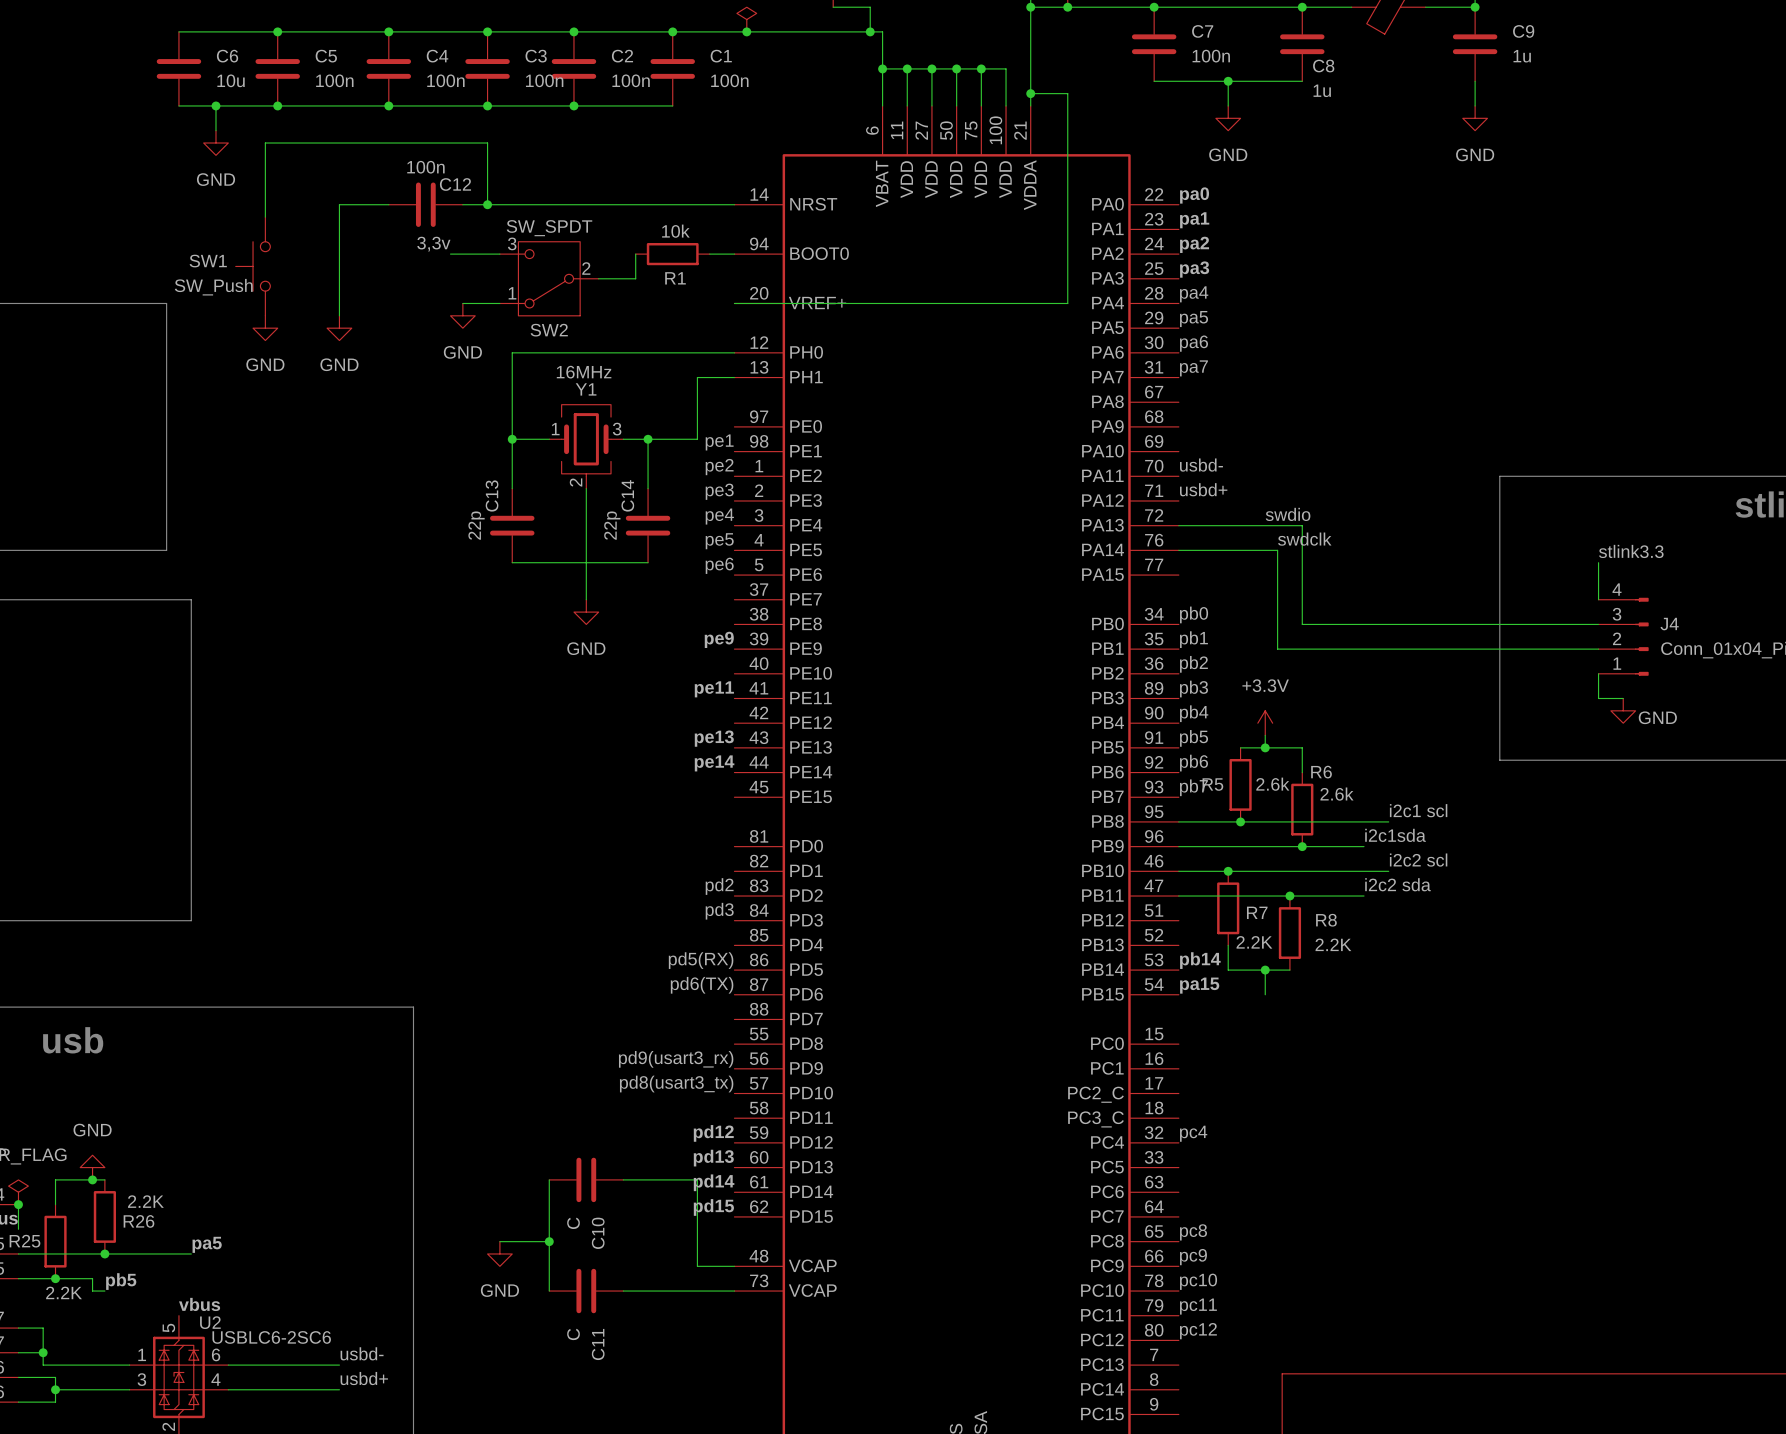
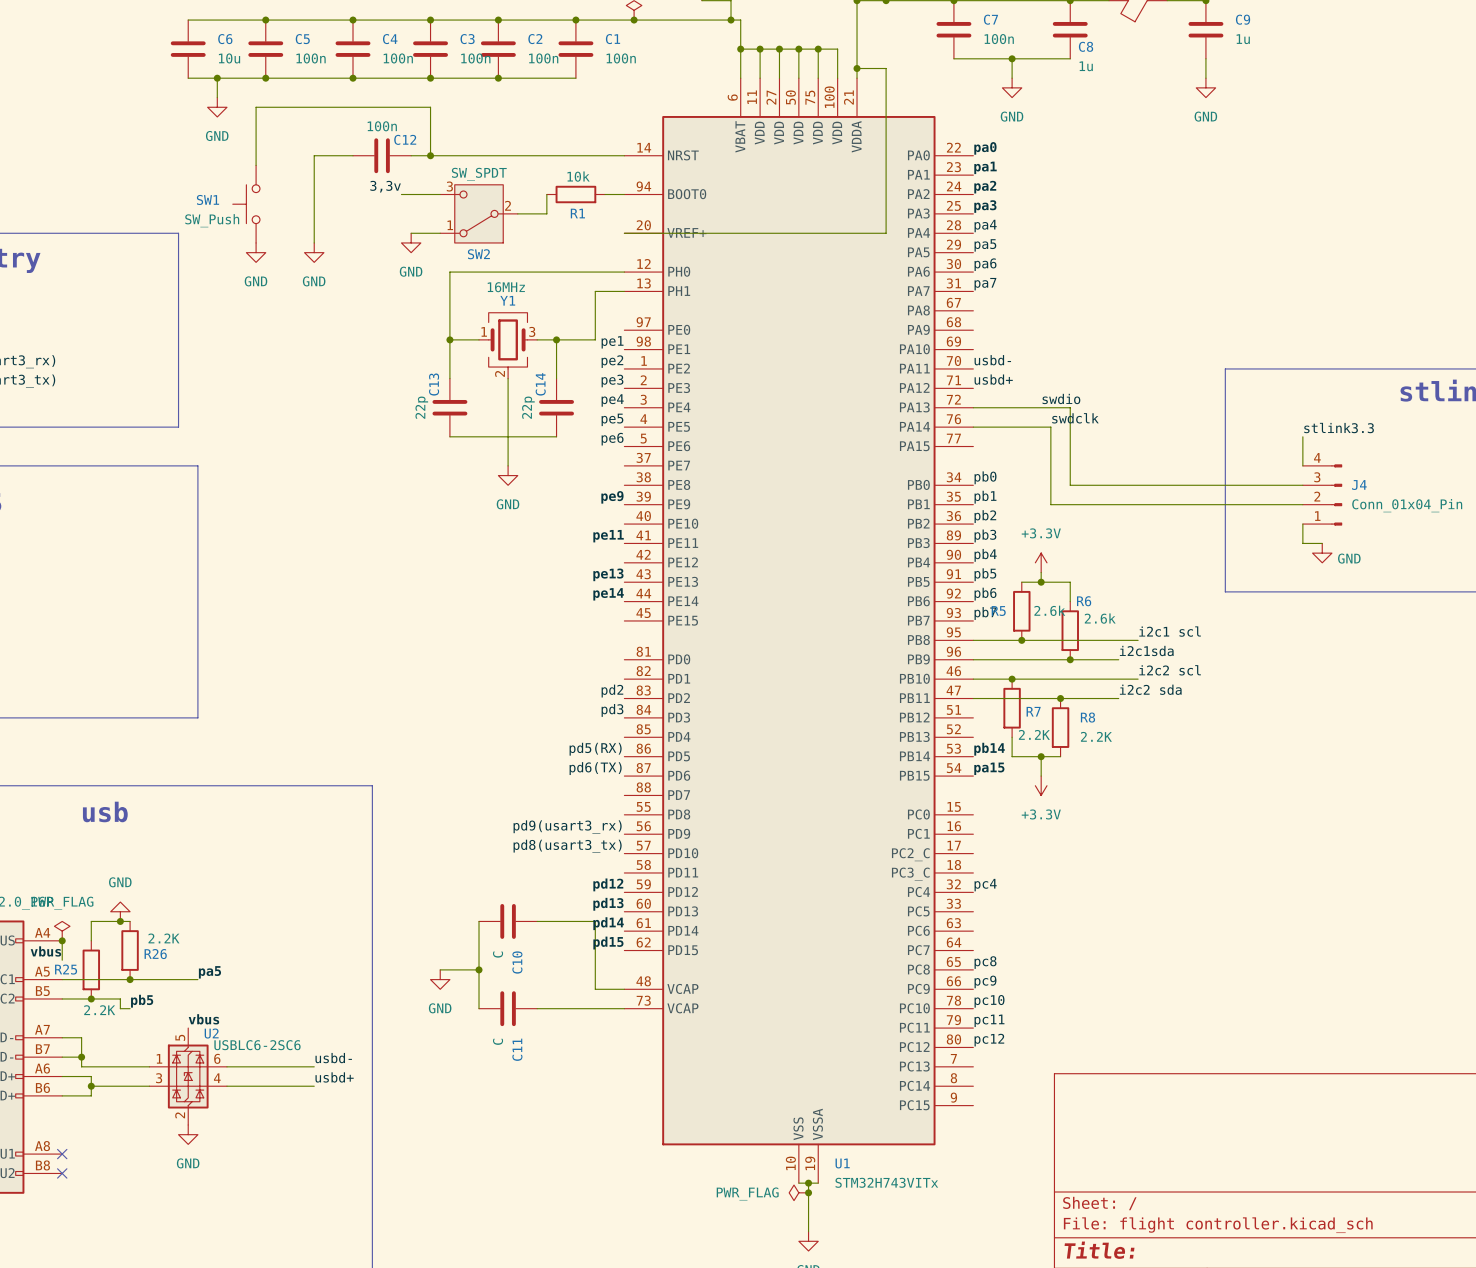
power symbol: none -> +3.3V (1041, 785)

